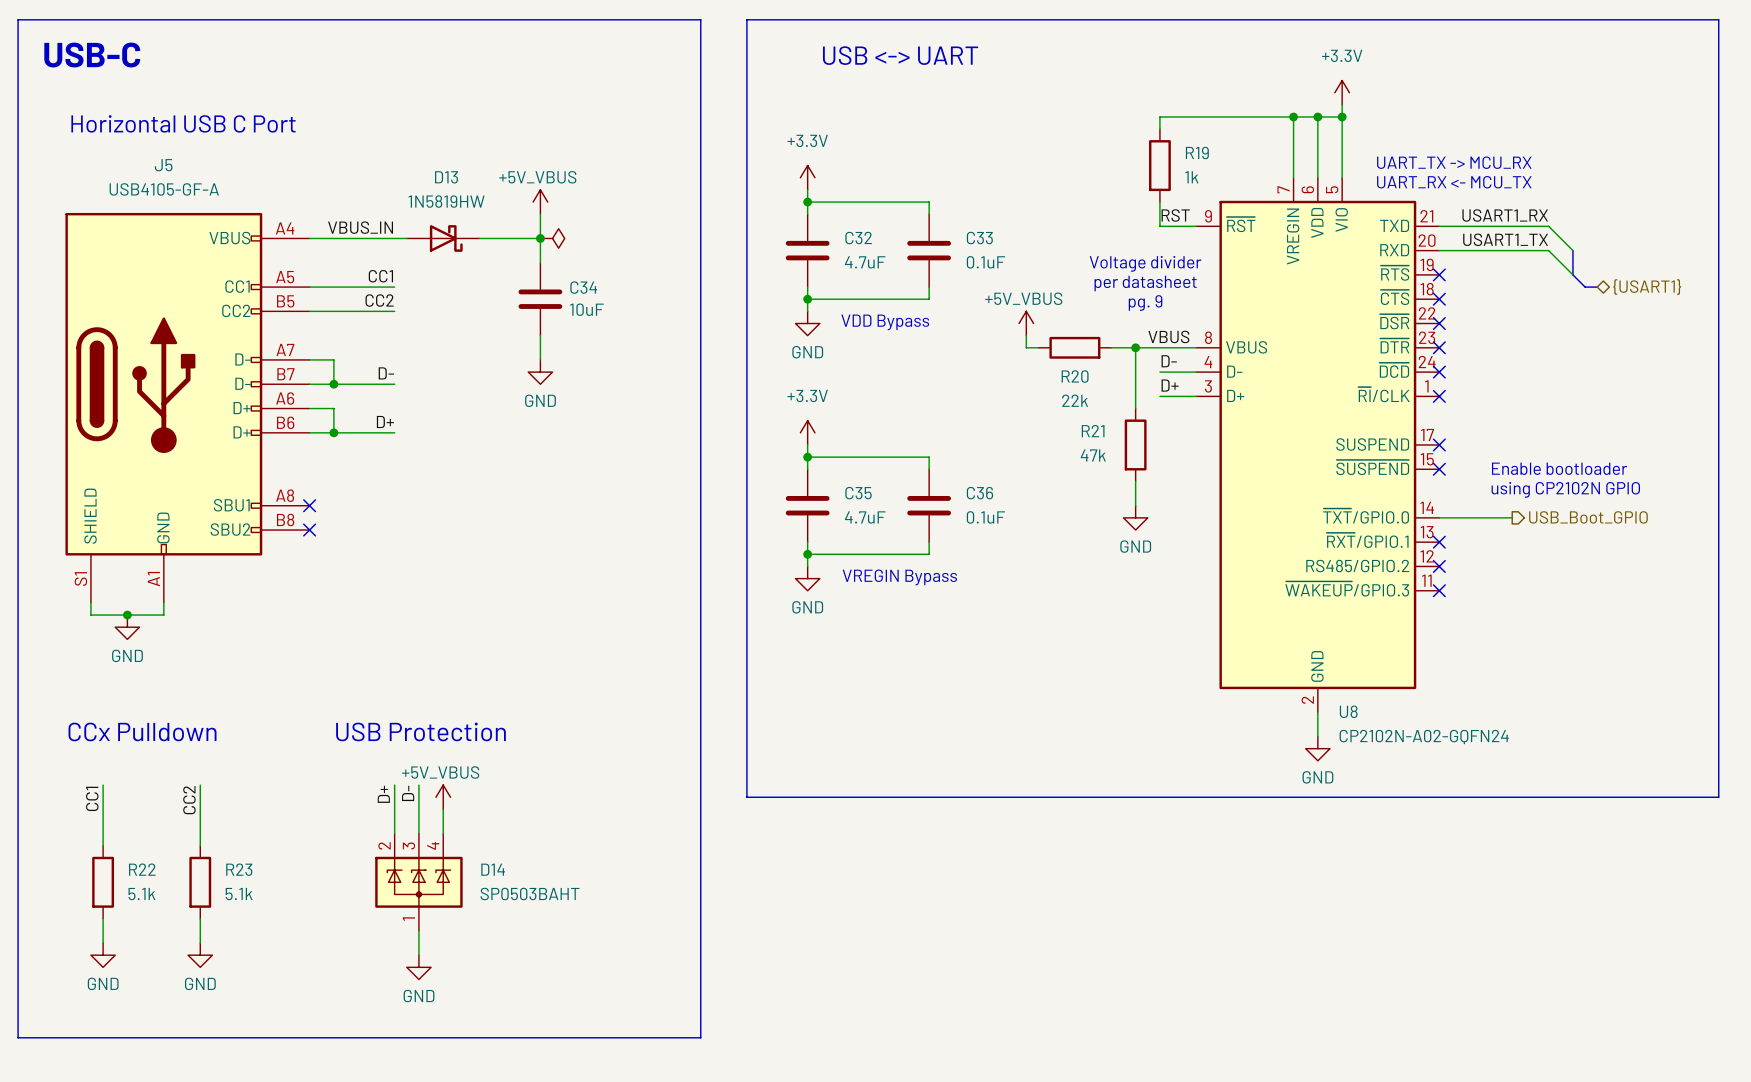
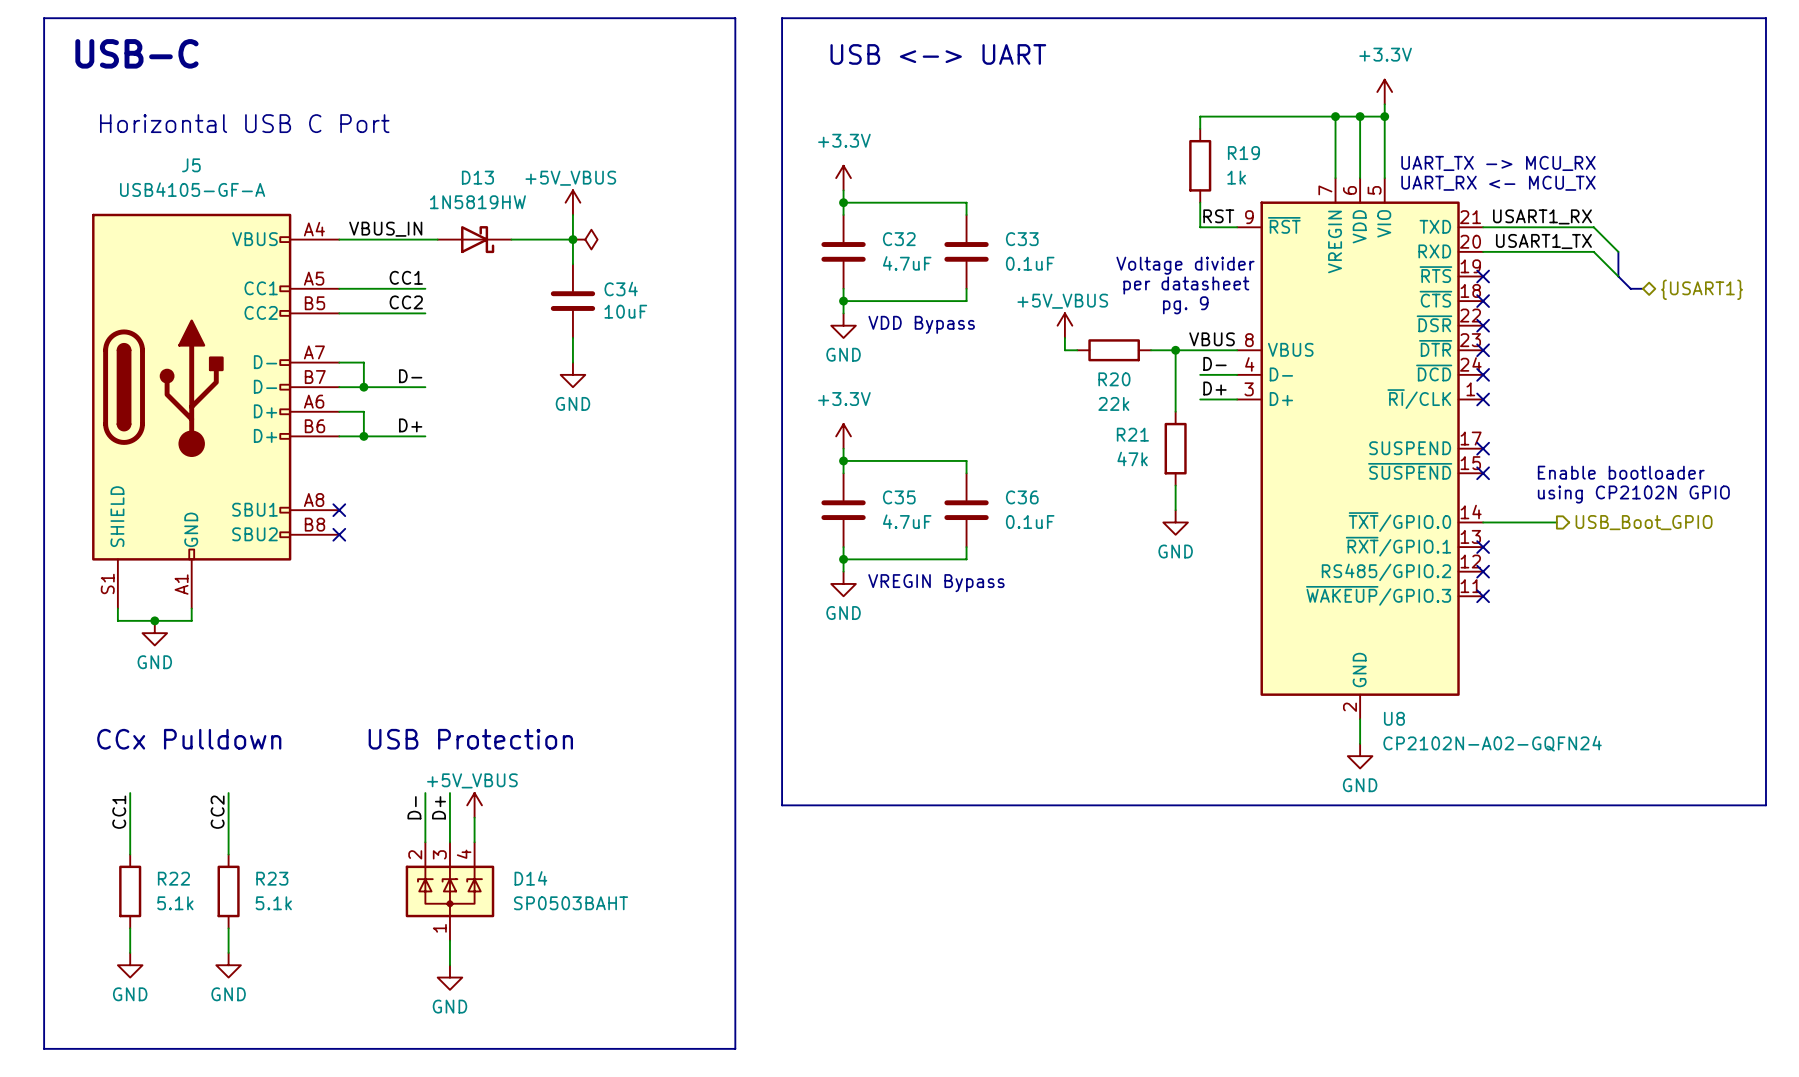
label: D- (408, 793) -> D+ (439, 807)
label: D+ (383, 794) -> D- (414, 807)

